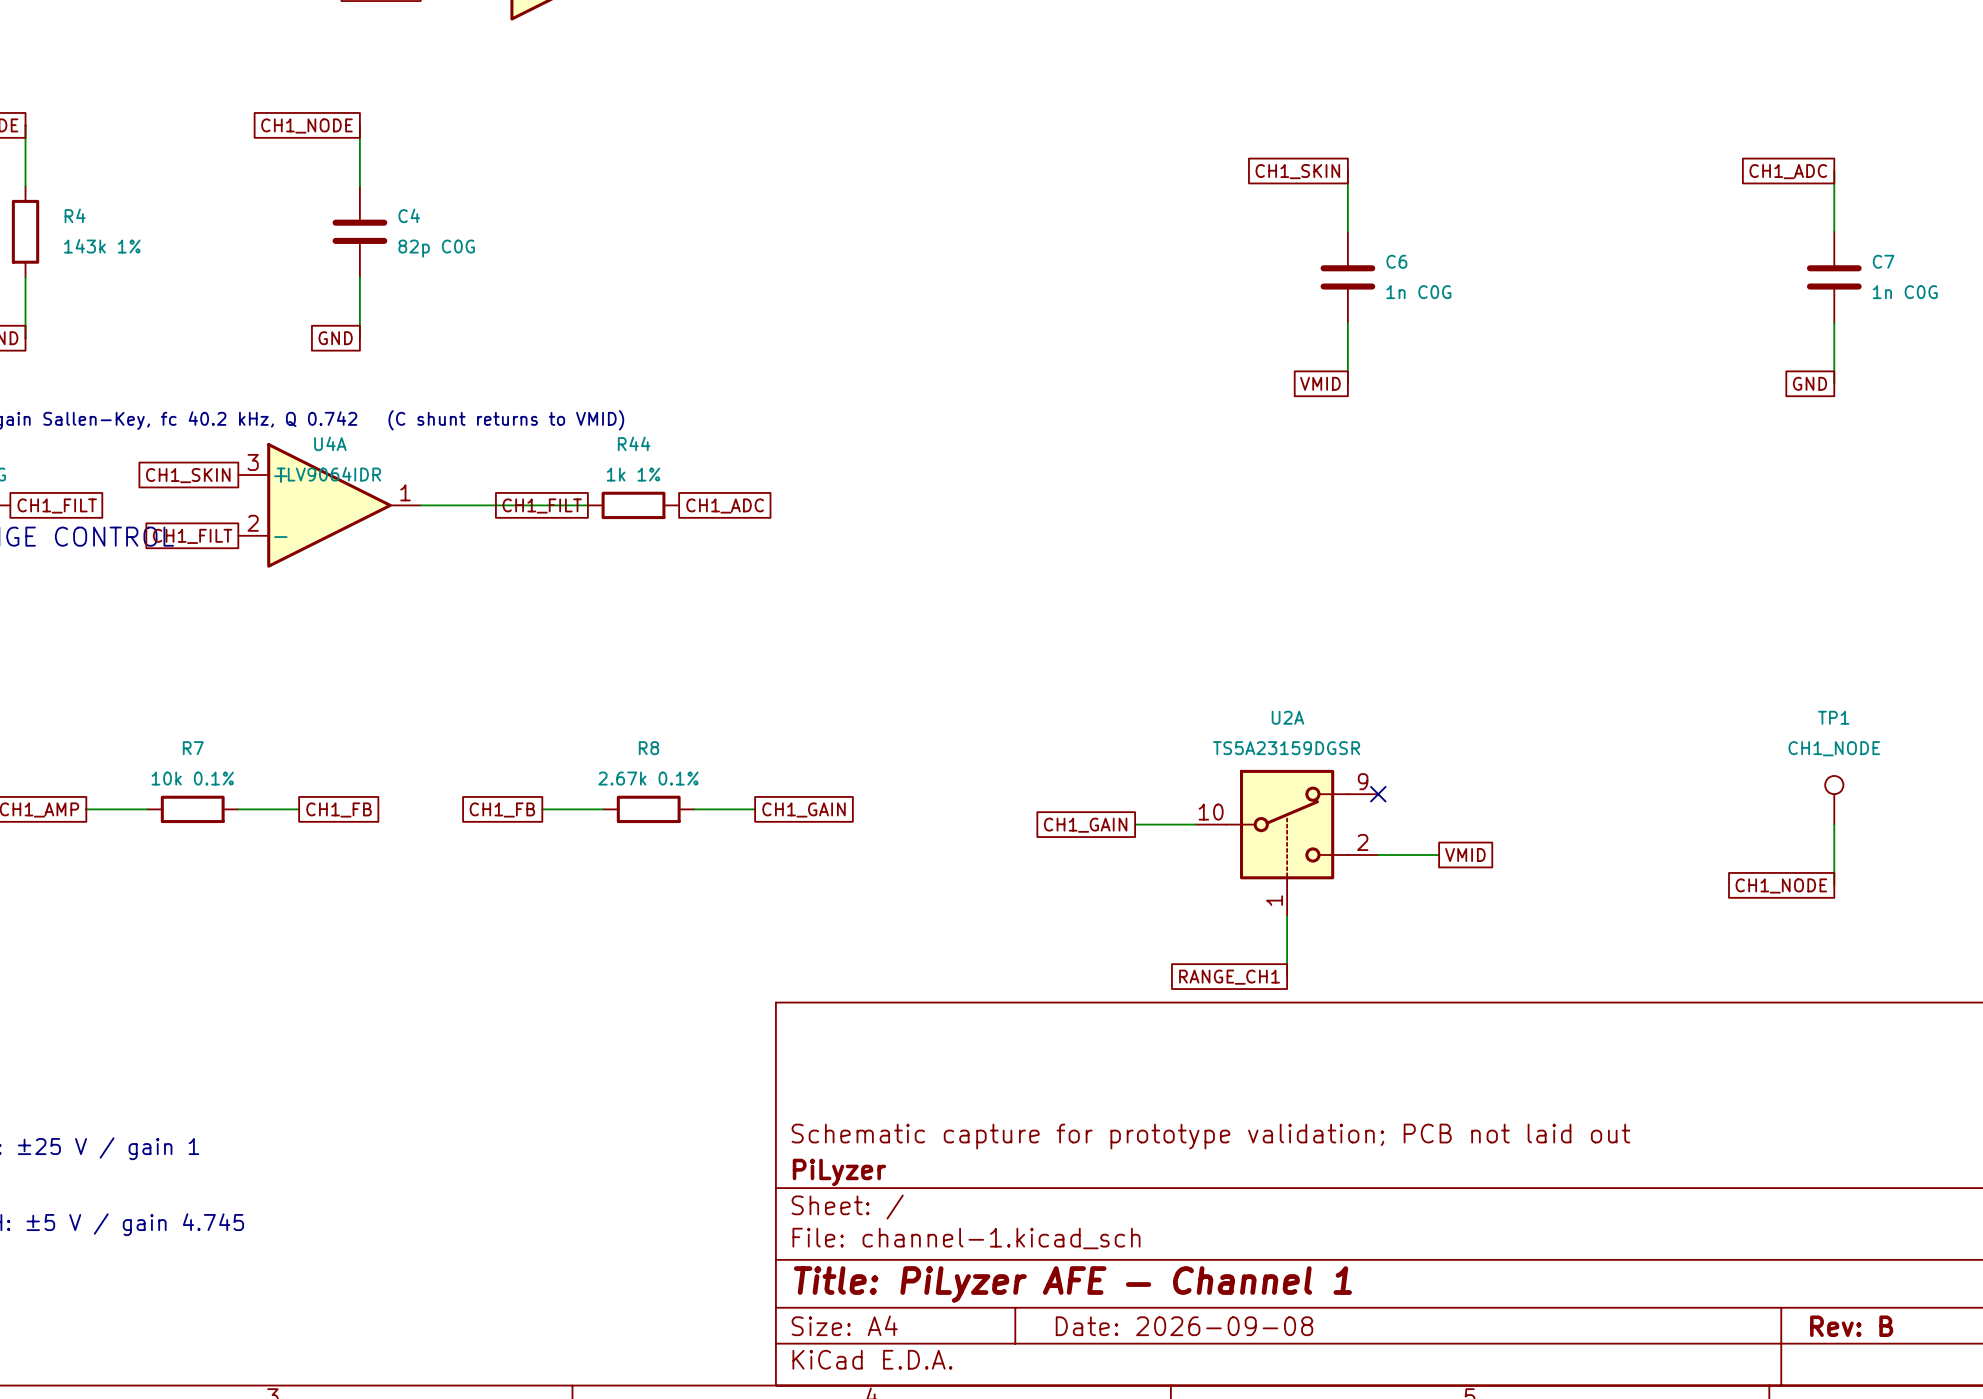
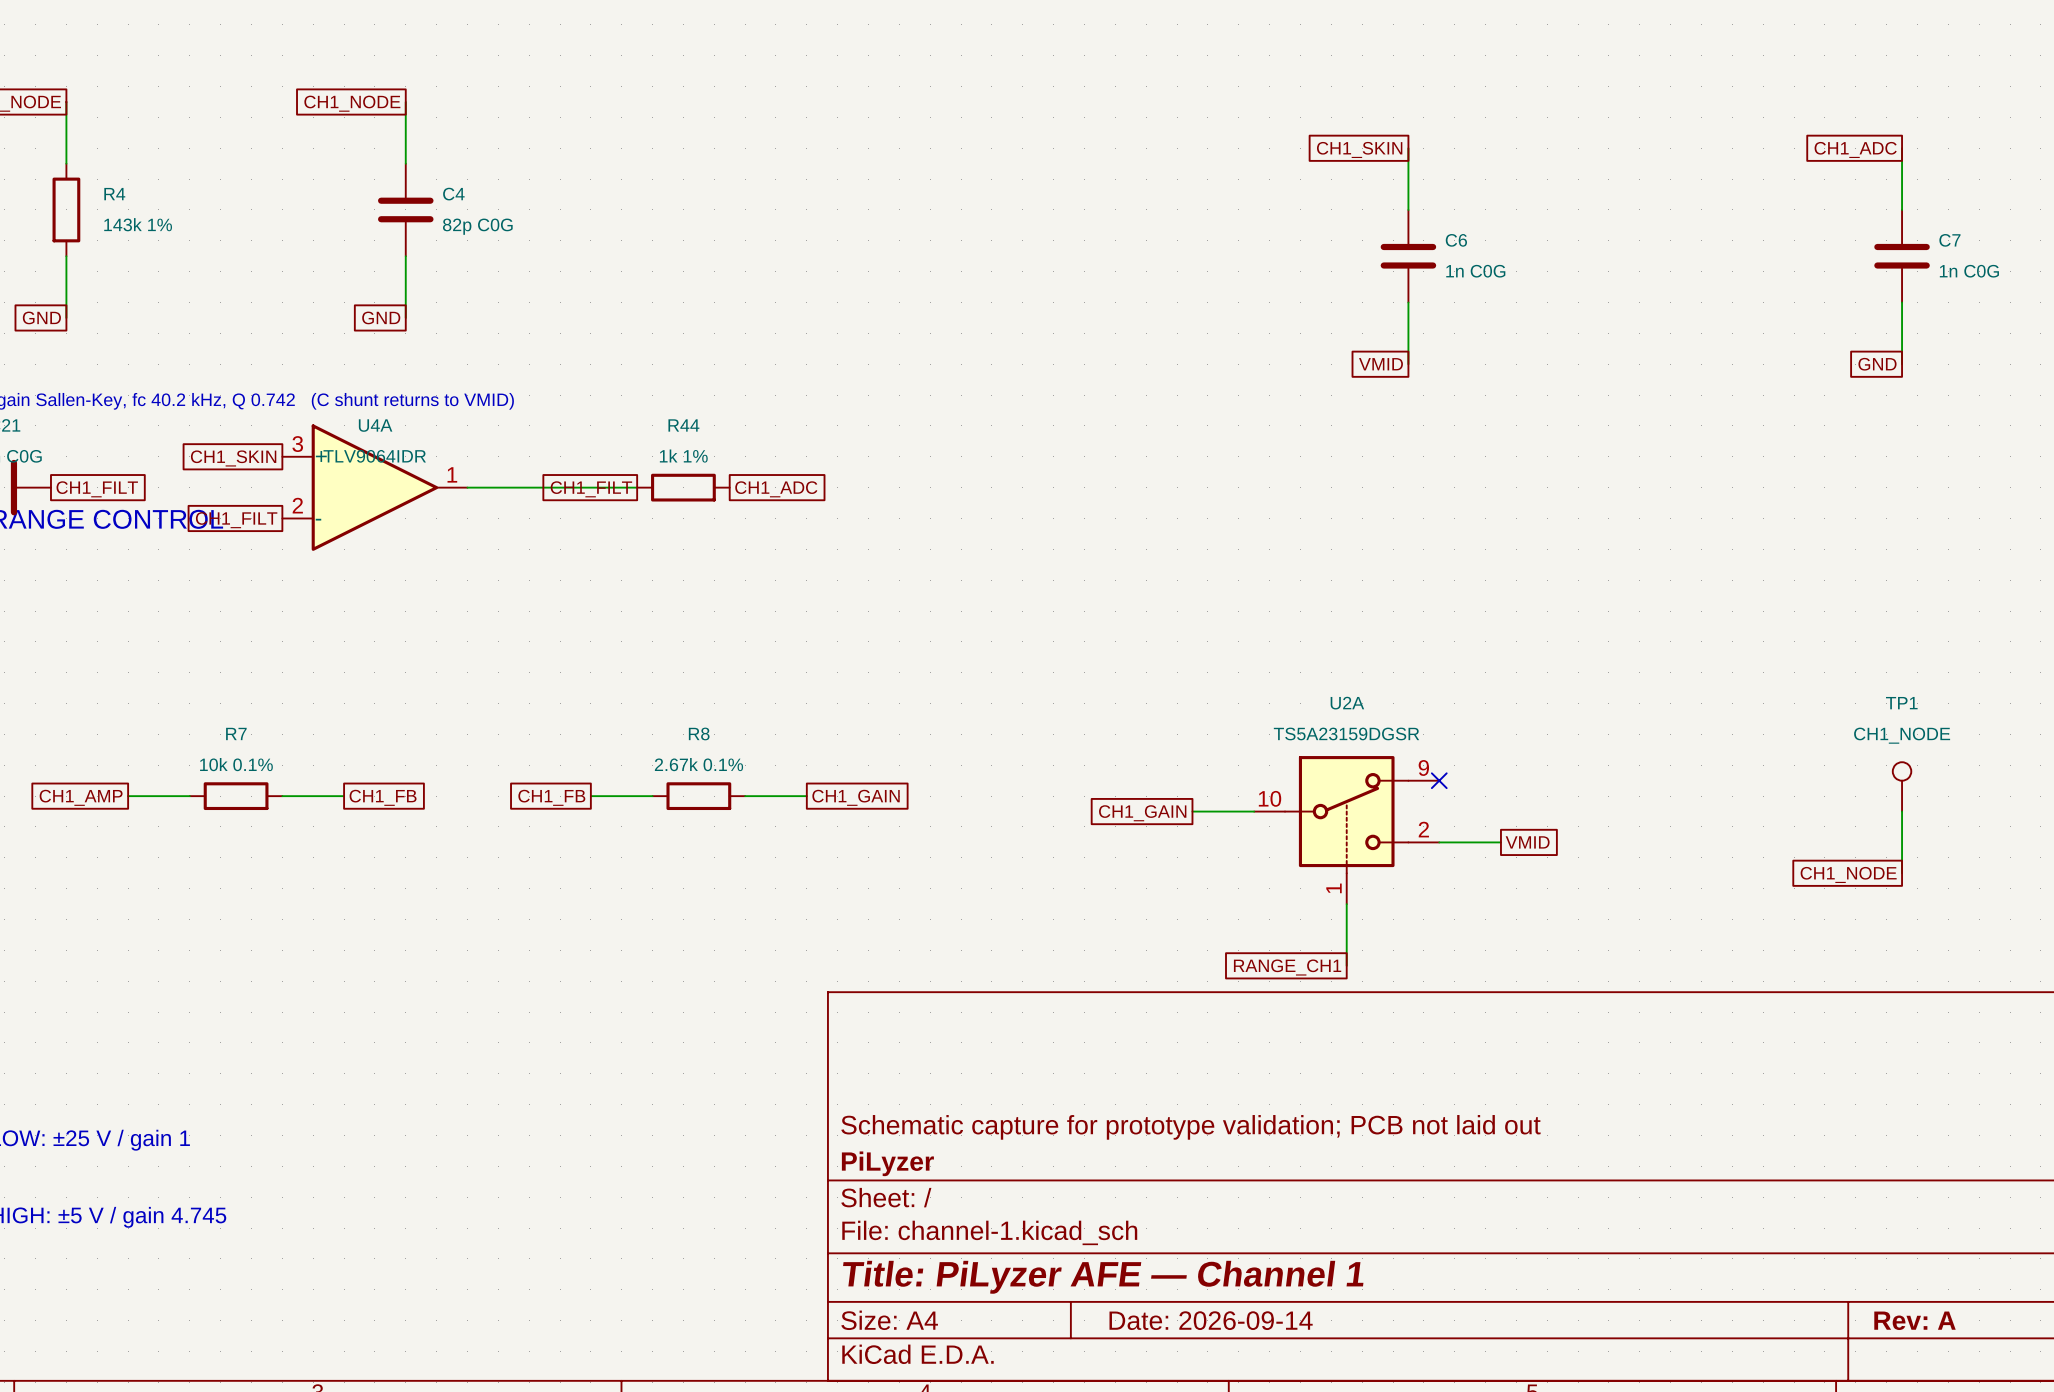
title block: Date: 2026-09-08 (1184, 1326) -> Date: 2026-09-14 (1211, 1320)
title block: Rev: B (1851, 1326) -> Rev: A (1915, 1320)

